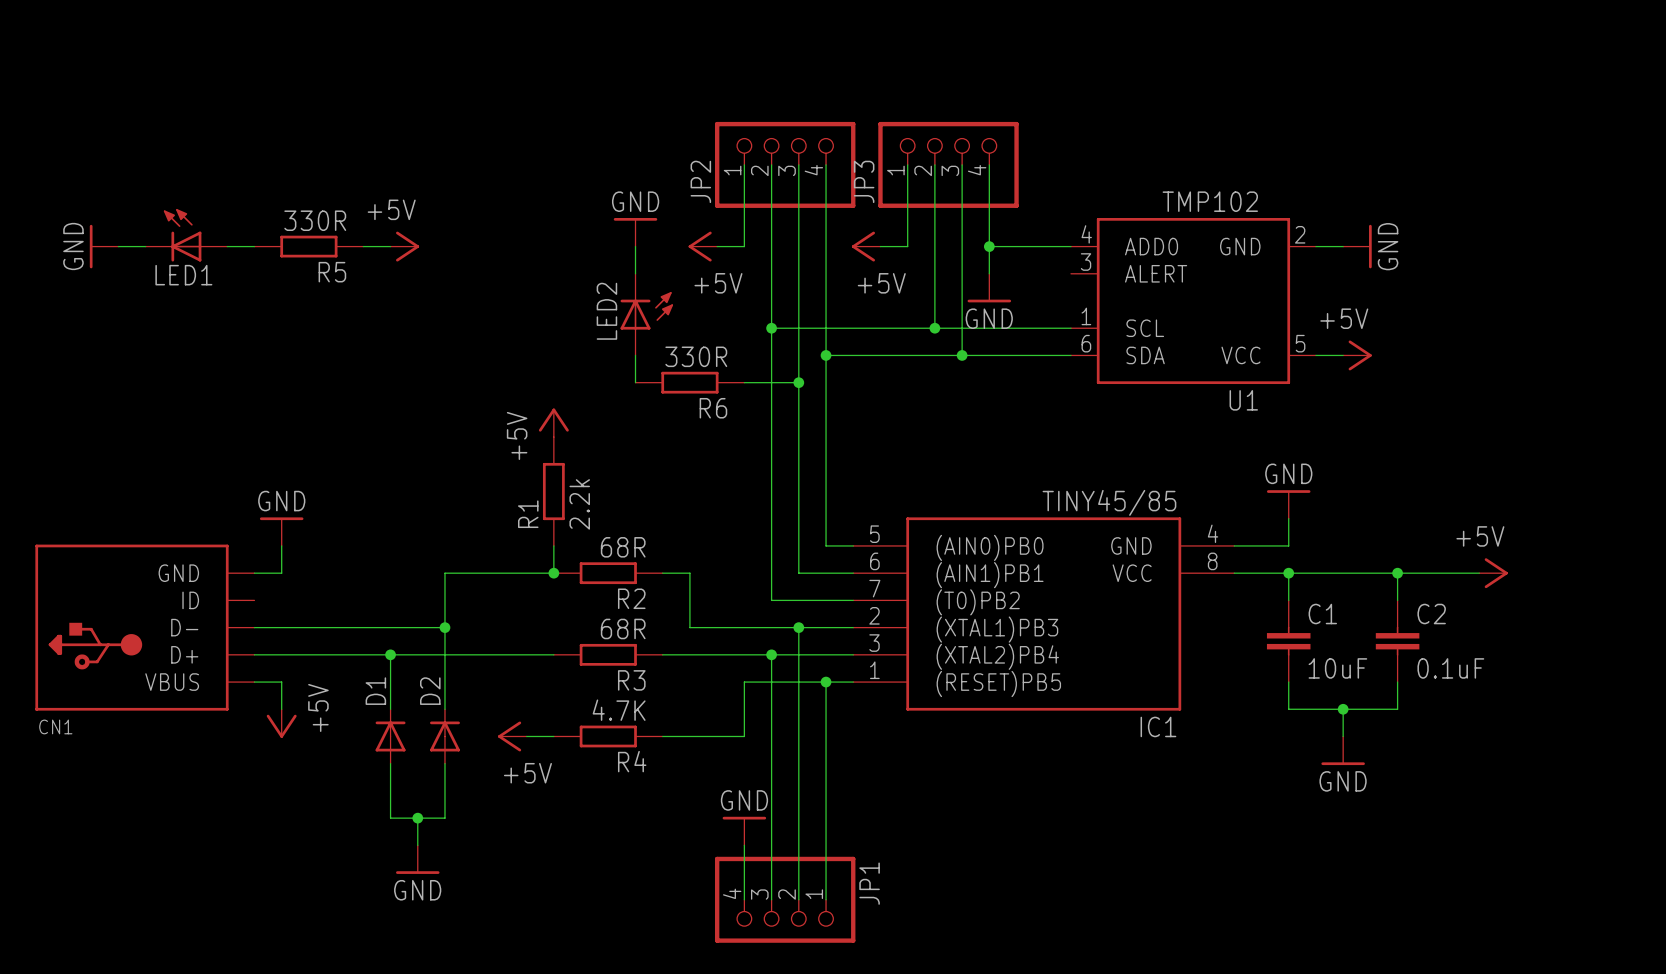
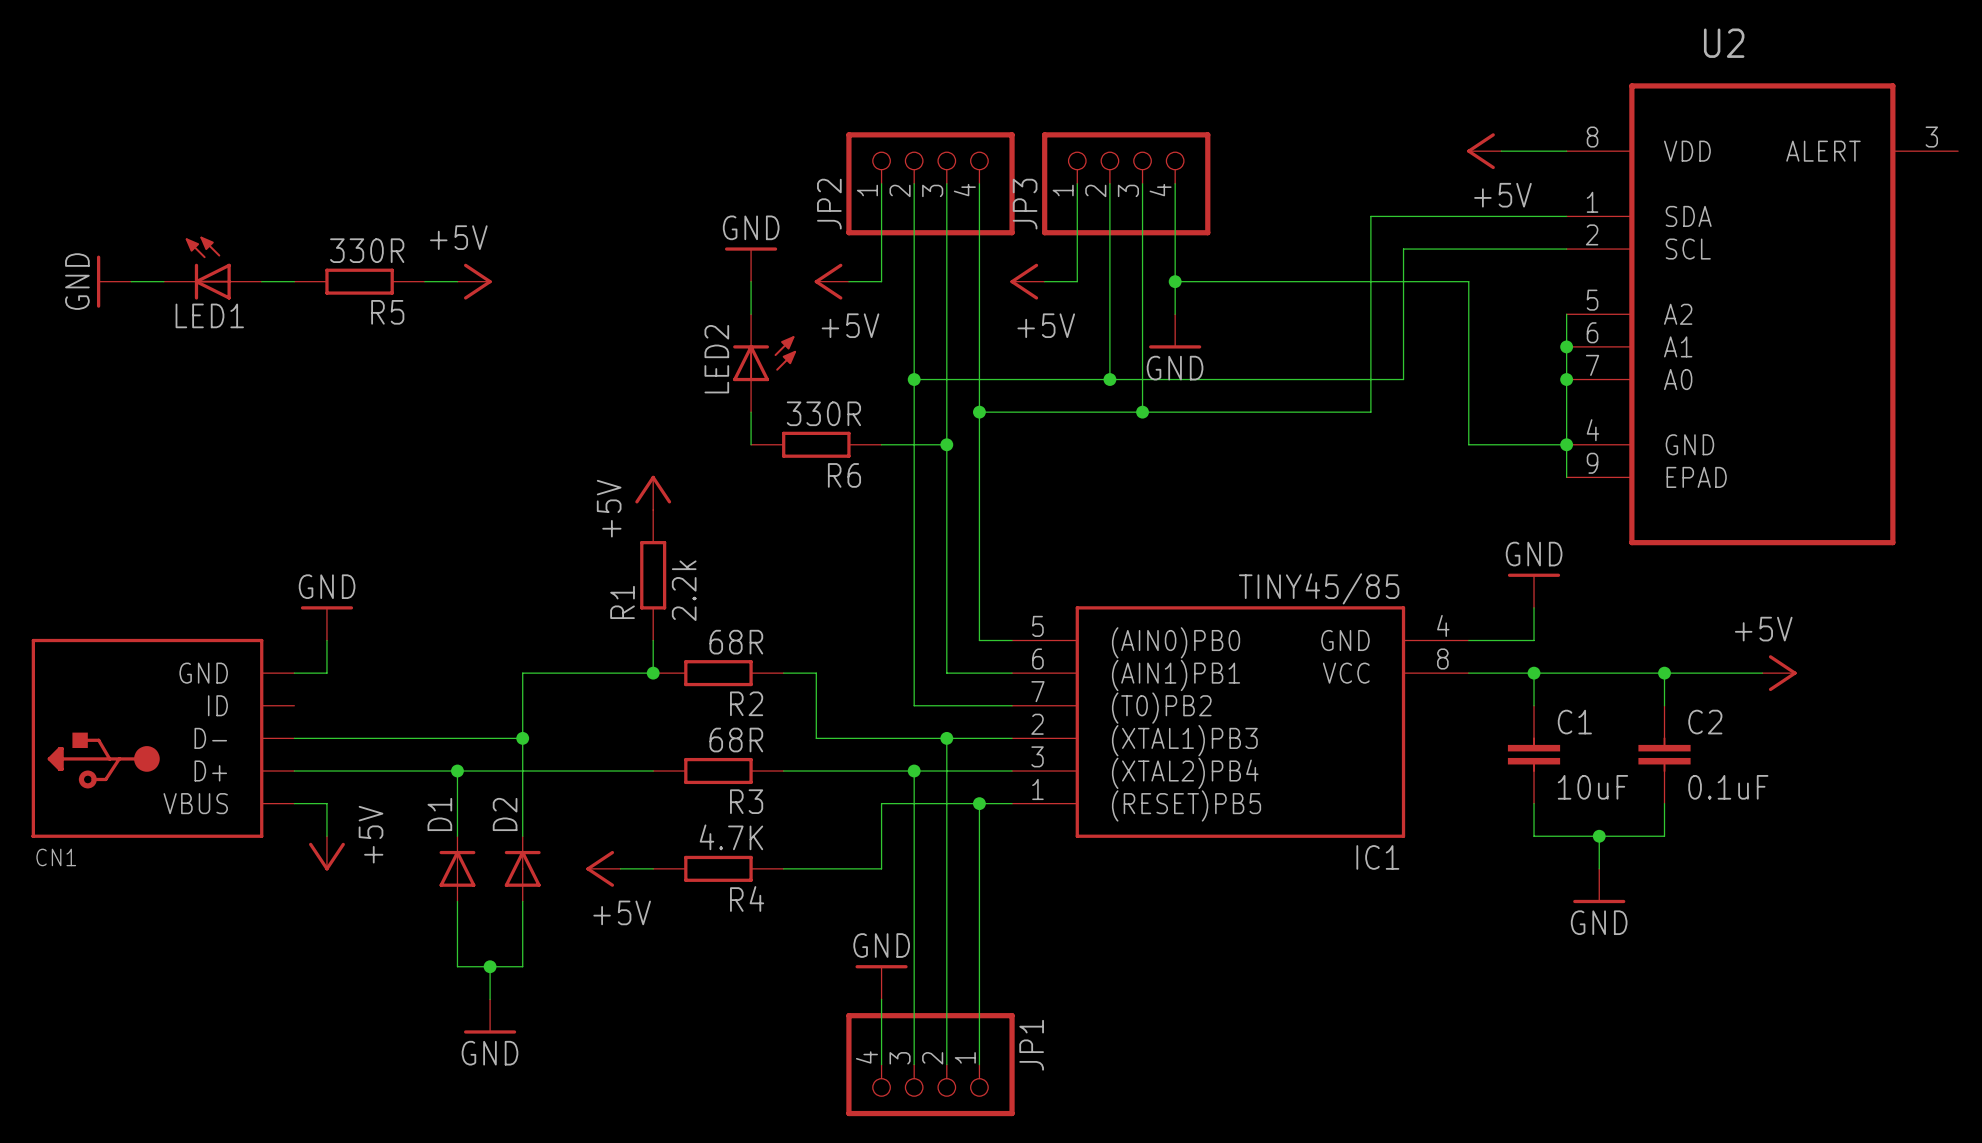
wire: none -> (1501, 151) (1566, 151)
wire: none -> (1566, 216) (1370, 216) (1370, 412) (1273, 412)
wire: none -> (1566, 249) (1403, 249) (1403, 379) (1273, 379)
wire: none -> (1273, 281) (1468, 281) (1468, 444) (1566, 444)
wire: (1315, 246) (1343, 246) -> none
power symbol: GND (1357, 246) -> none
wire: none -> (1566, 314) (1566, 477)
U2: none -> (1762, 314)
U1: TMP102 (1193, 301) -> none
junction: none -> (1566, 346)
junction: none -> (1566, 379)
wire: (1315, 355) (1343, 355) -> none
power symbol position: +5V (1357, 355) -> +5V (1484, 151)
power symbol rotation: 0° (1360, 355) -> 180° (1481, 151)
junction: none -> (1566, 444)

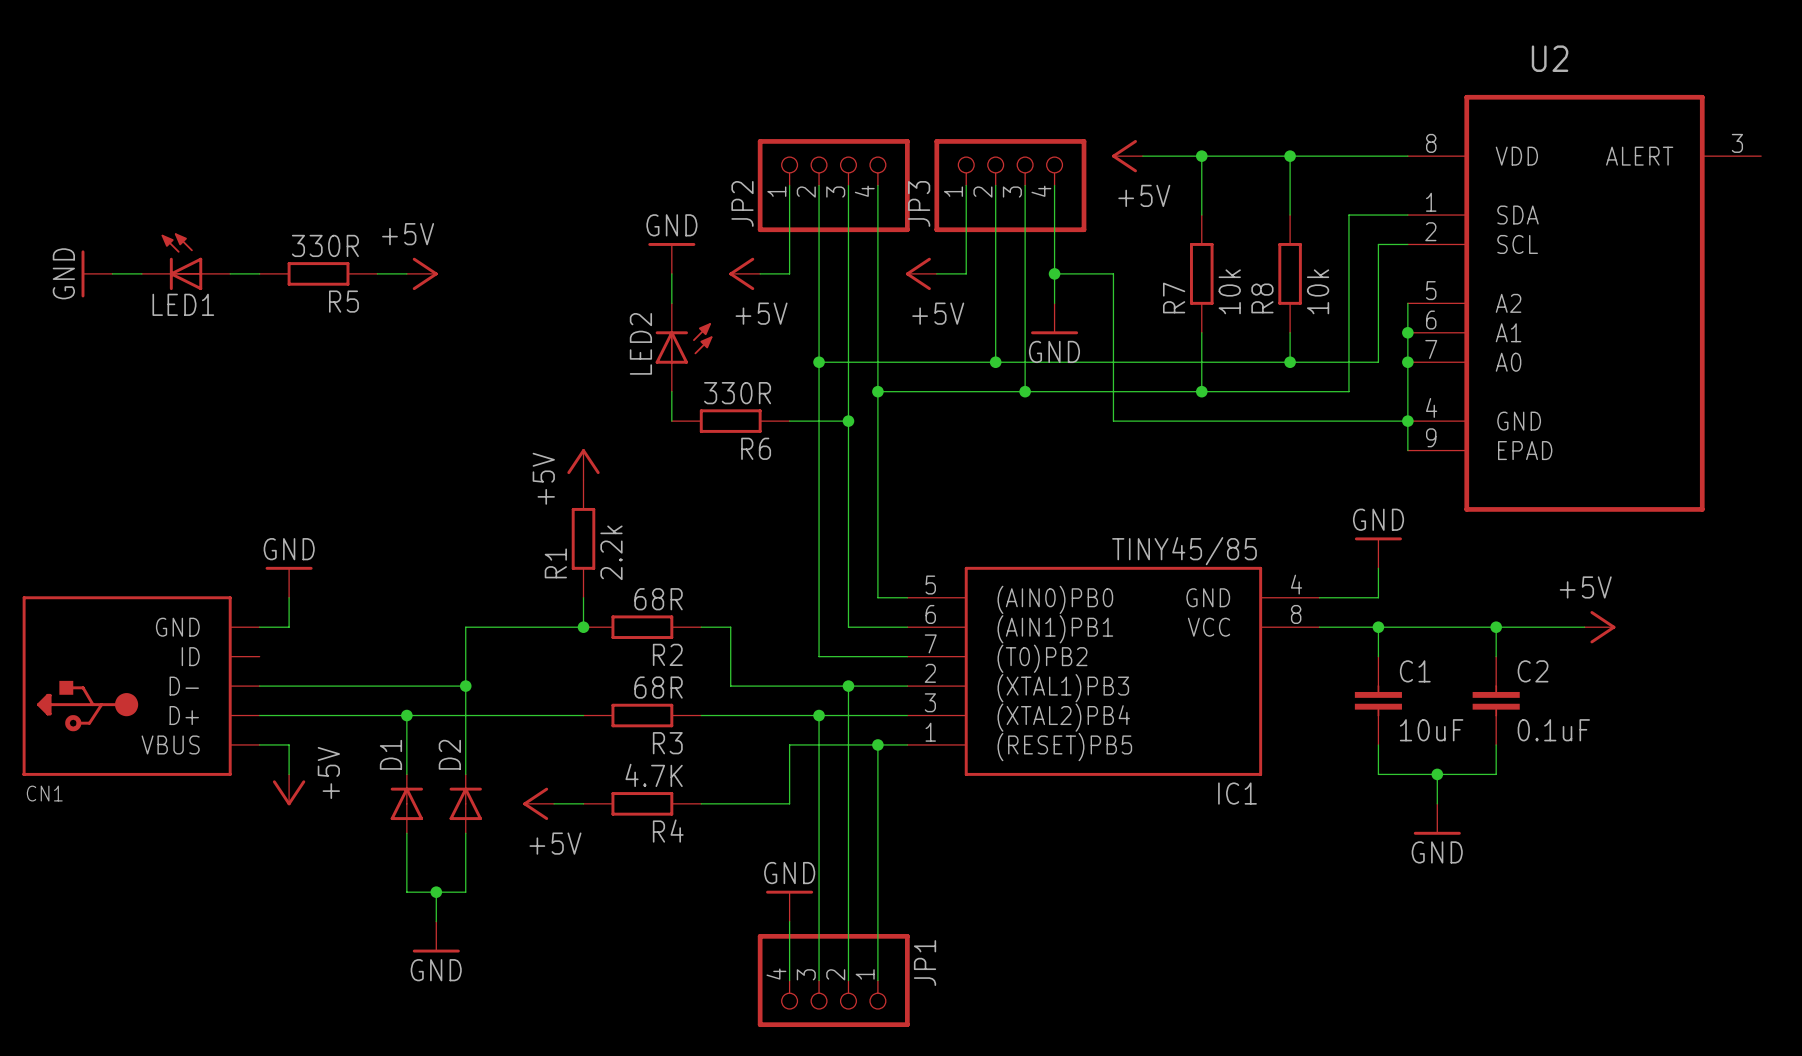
wire: none -> (1142, 156) (1348, 156)
wire: none -> (1201, 156) (1201, 215)
junction: none -> (1201, 156)
wire: none -> (1290, 156) (1290, 215)
junction: none -> (1290, 156)
power symbol position: +5V (1484, 151) -> +5V (1127, 156)
wire: (1501, 216) (1370, 216) (1370, 412) -> (1348, 215) (1348, 391) (1231, 391)
wire: (1534, 249) (1403, 249) (1403, 379) -> (1378, 244) (1378, 362) (1260, 362)
wire: (1240, 281) (1468, 281) (1468, 444) -> (1113, 273) (1113, 421) (1319, 421)
R7: none -> 10k (1201, 273)
R8: none -> 10k (1290, 273)
wire: none -> (1201, 332) (1201, 391)
wire: none -> (1290, 332) (1290, 362)
junction: none -> (1290, 362)
junction: none -> (1201, 391)

